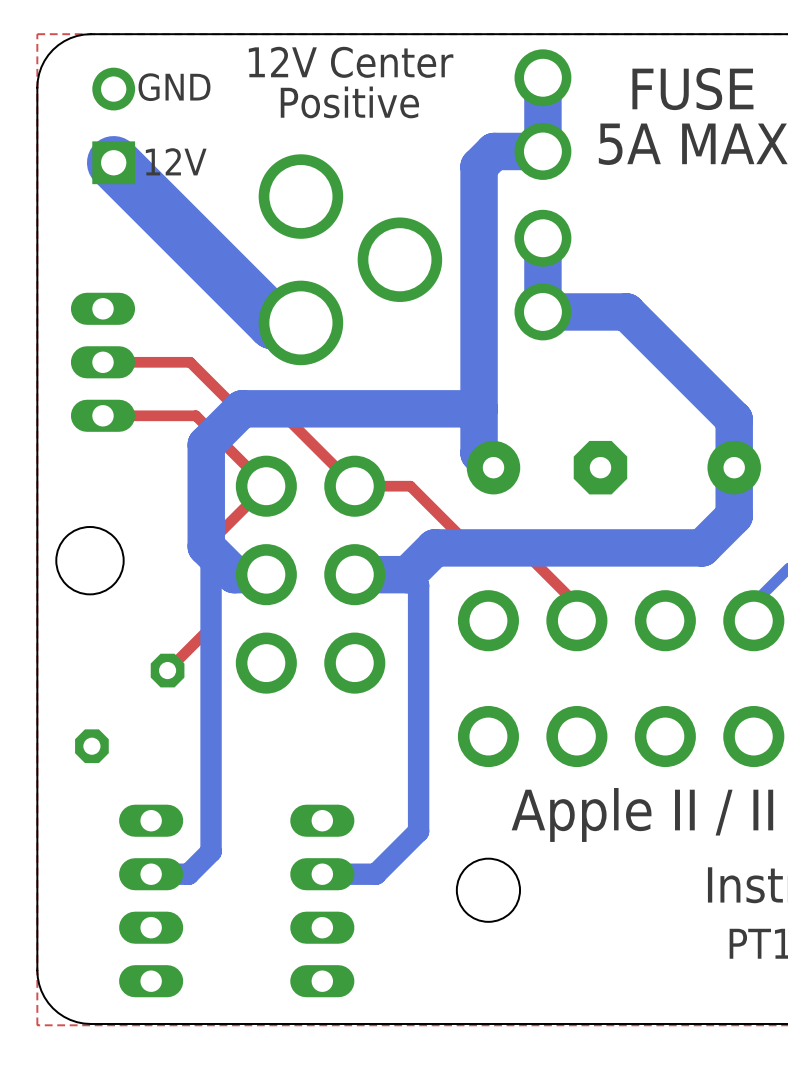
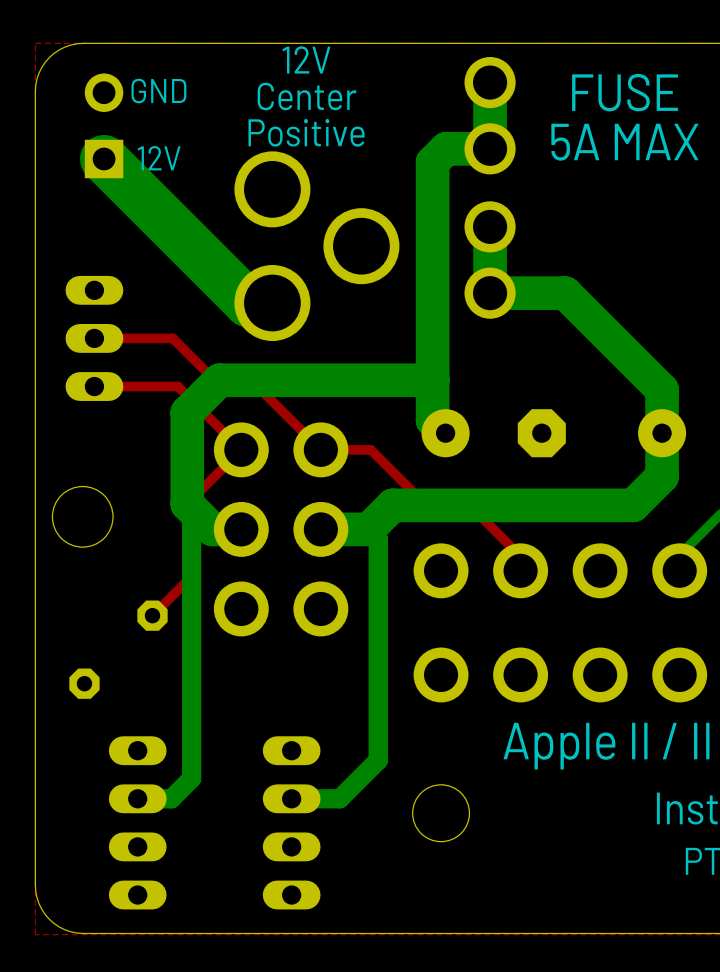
text: 12V Center (351, 62) -> 12V (306, 59)
text: Positive (349, 102) -> Center (307, 96)
text: none -> Positive (306, 132)

